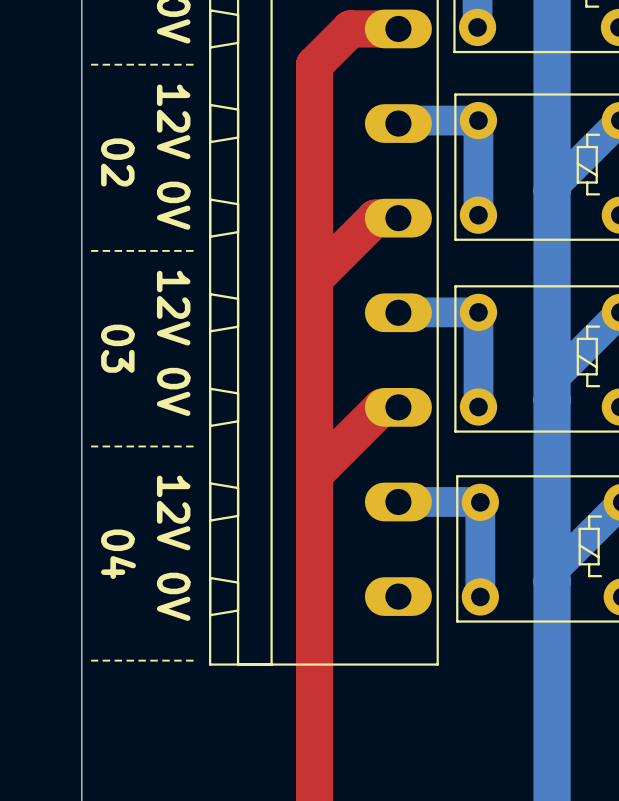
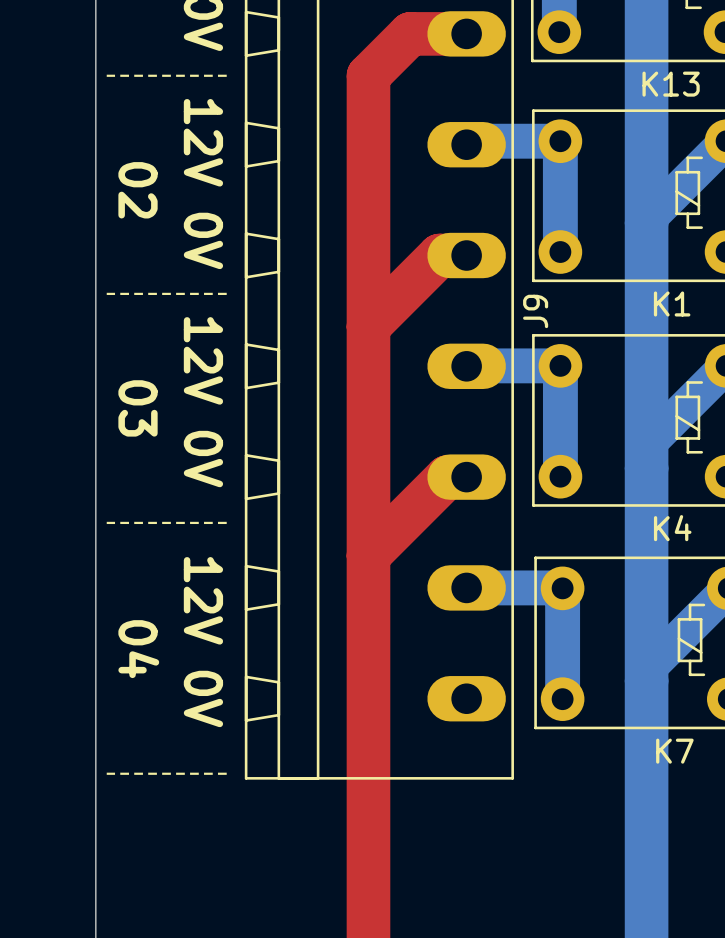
K13 name: none -> K13 (671, 84)
K1 name: none -> K1 (672, 303)
J9 name: none -> J9 (535, 311)
K4 name: none -> K4 (672, 528)
K7 name: none -> K7 (674, 751)

